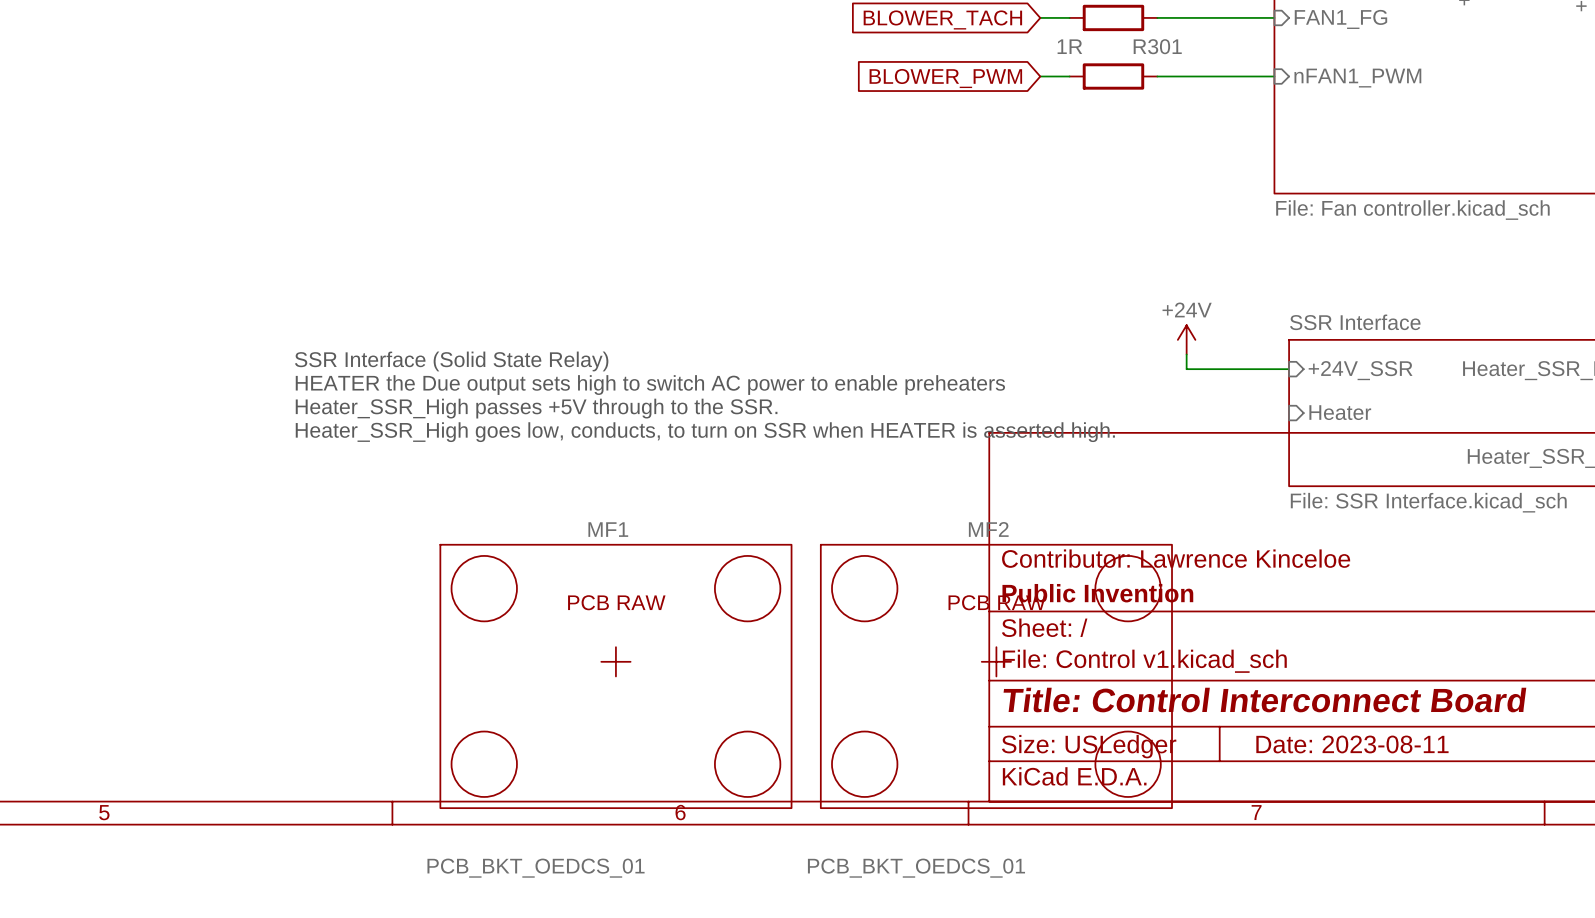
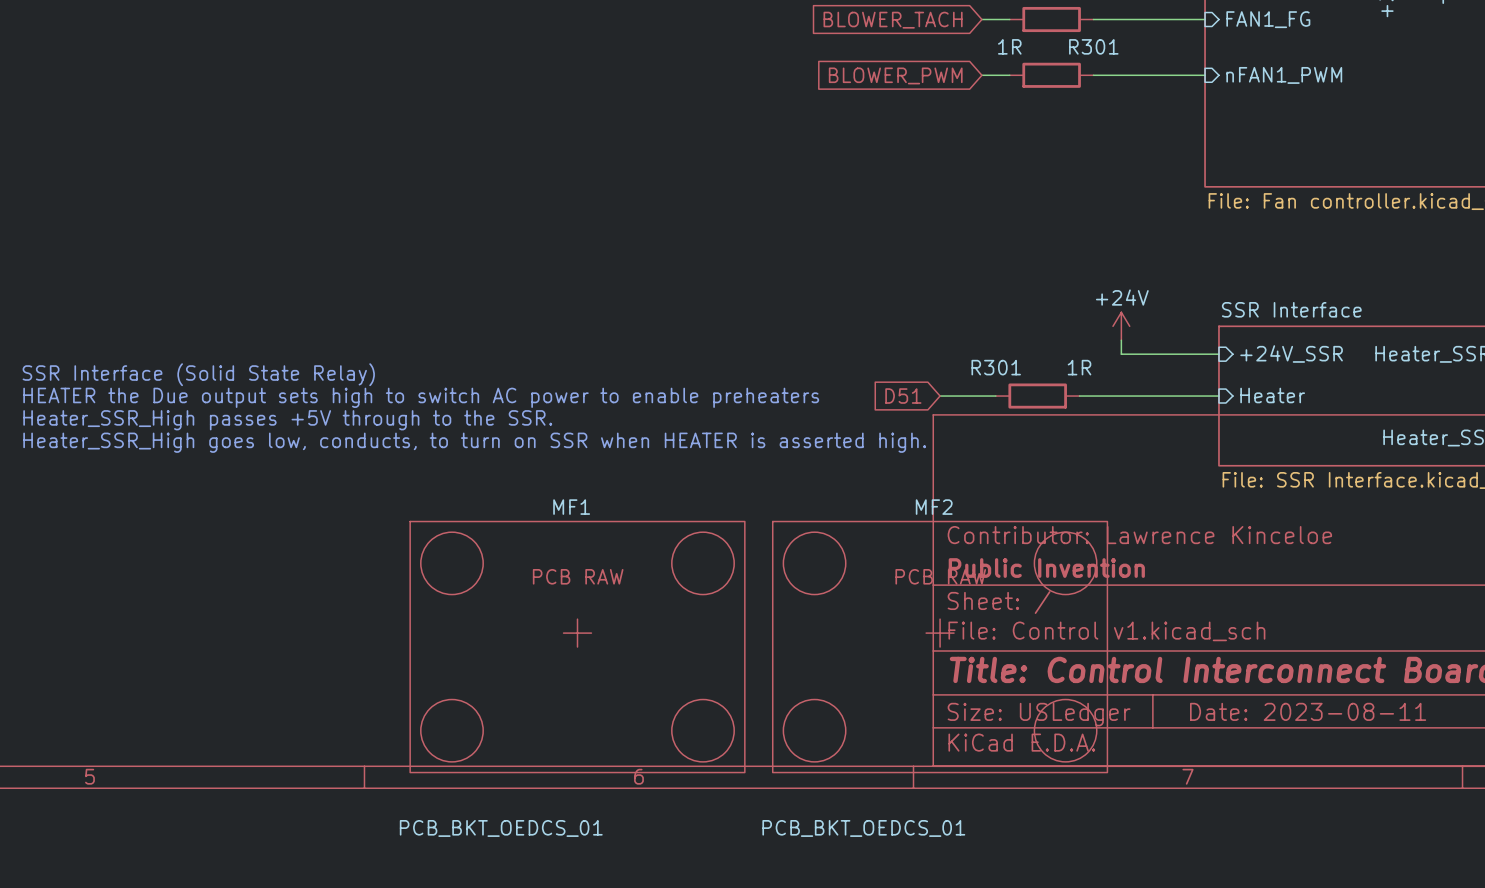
text position: SSR Interface (Solid State Relay) (451, 361) -> SSR Interface (Solid State Relay) (198, 374)
text position: HEATER the Due output sets high to switch AC power to enable preheaters (650, 385) -> HEATER the Due output sets high to switch AC power to enable preheaters (421, 397)
text position: Heater_SSR_High passes +5V through to the SSR. (536, 408) -> Heater_SSR_High passes +5V through to the SSR. (287, 420)
global label: none -> D51 (903, 396)
wire: none -> (940, 396) (995, 396)
R301: none -> 1R (1037, 396)
wire: none -> (1079, 396) (1218, 396)
text position: Heater_SSR_High goes low, conducts, to turn on SSR when HEATER is asserted high. (705, 432) -> Heater_SSR_High goes low, conducts, to turn on SSR when HEATER is asserted high. (474, 442)

